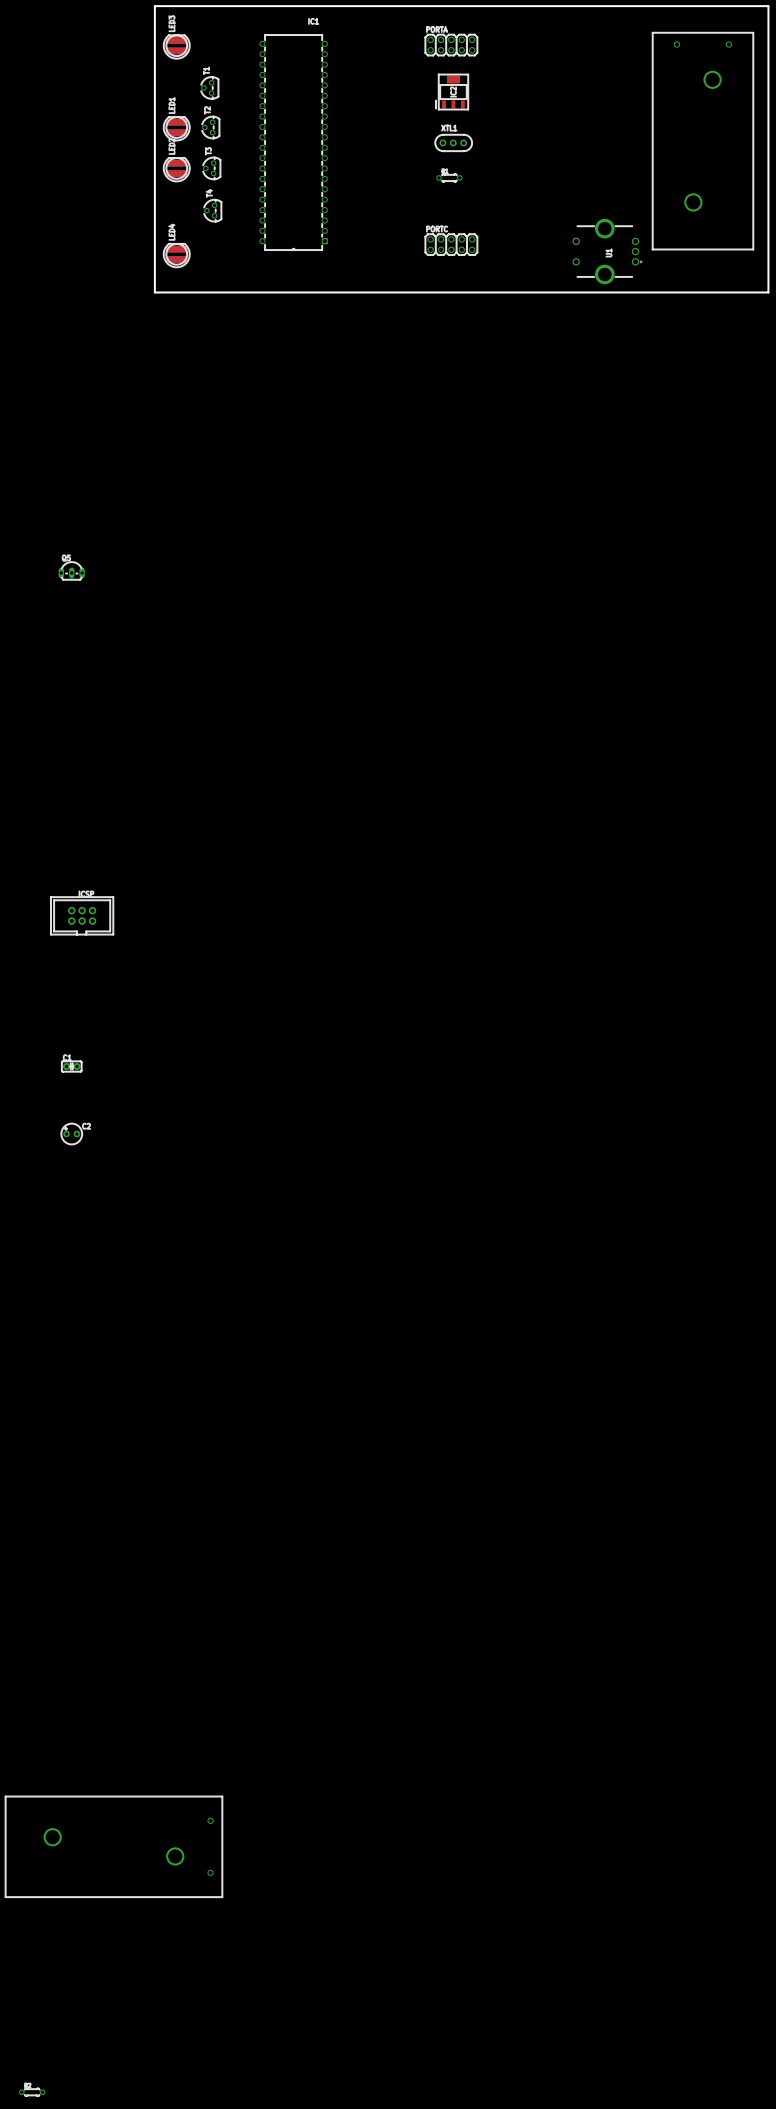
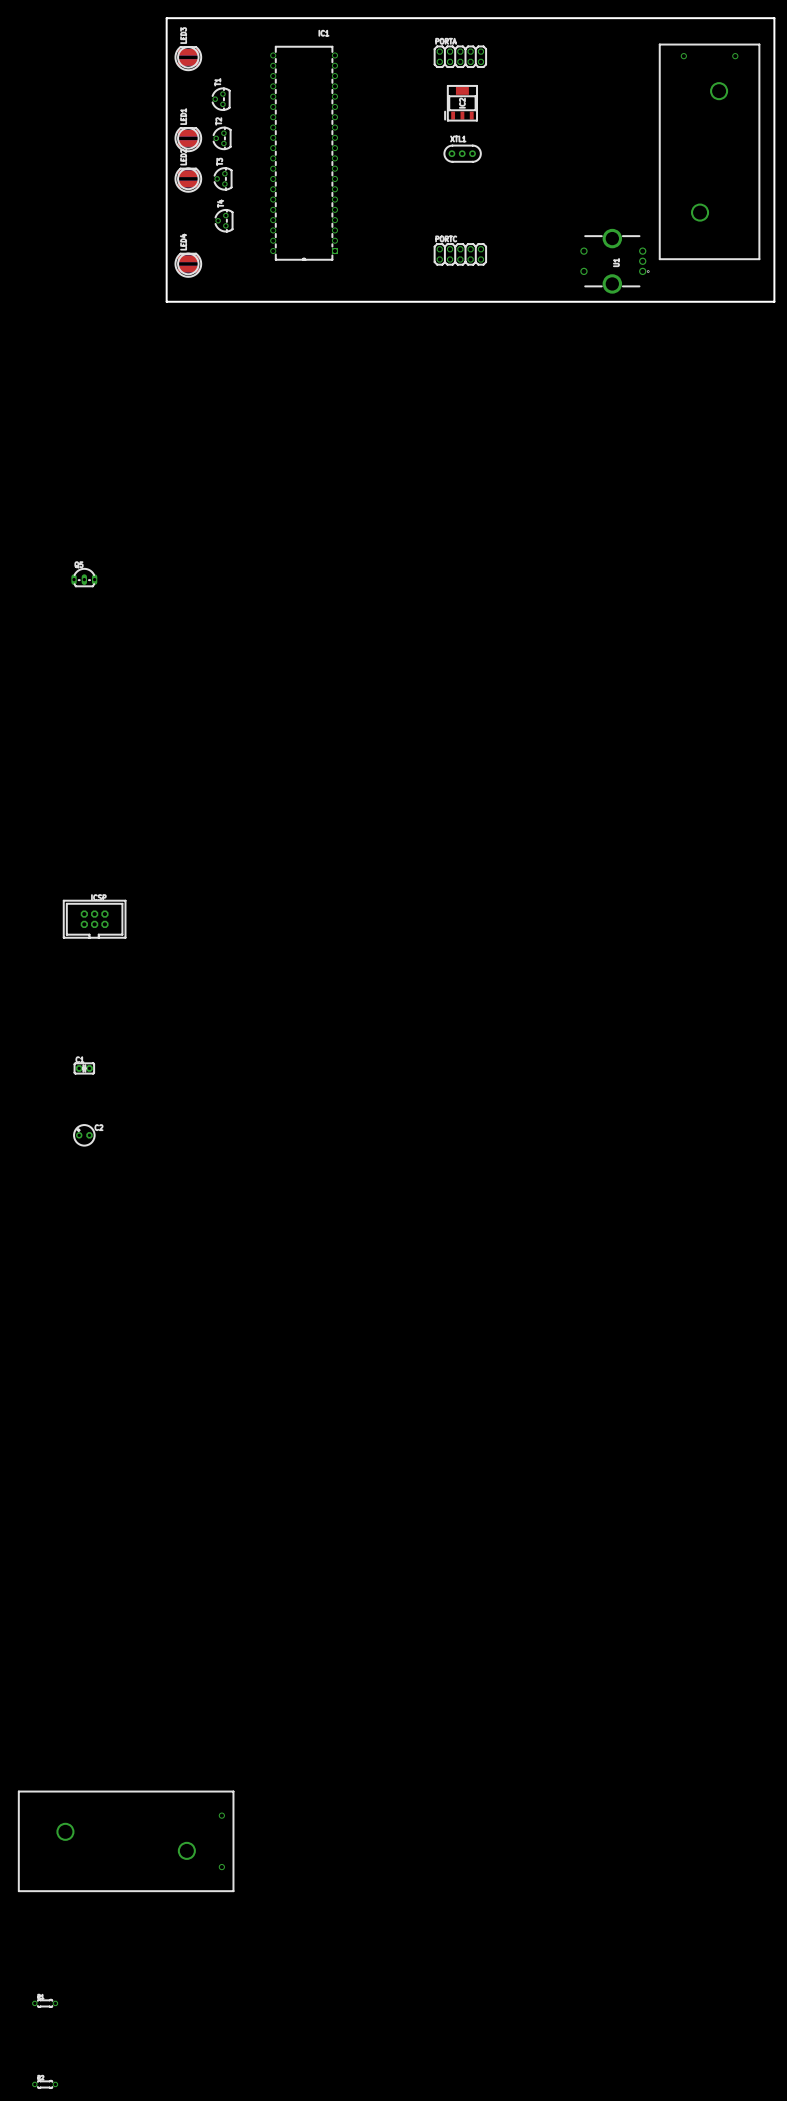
part position: (449, 177) -> (45, 2003)

